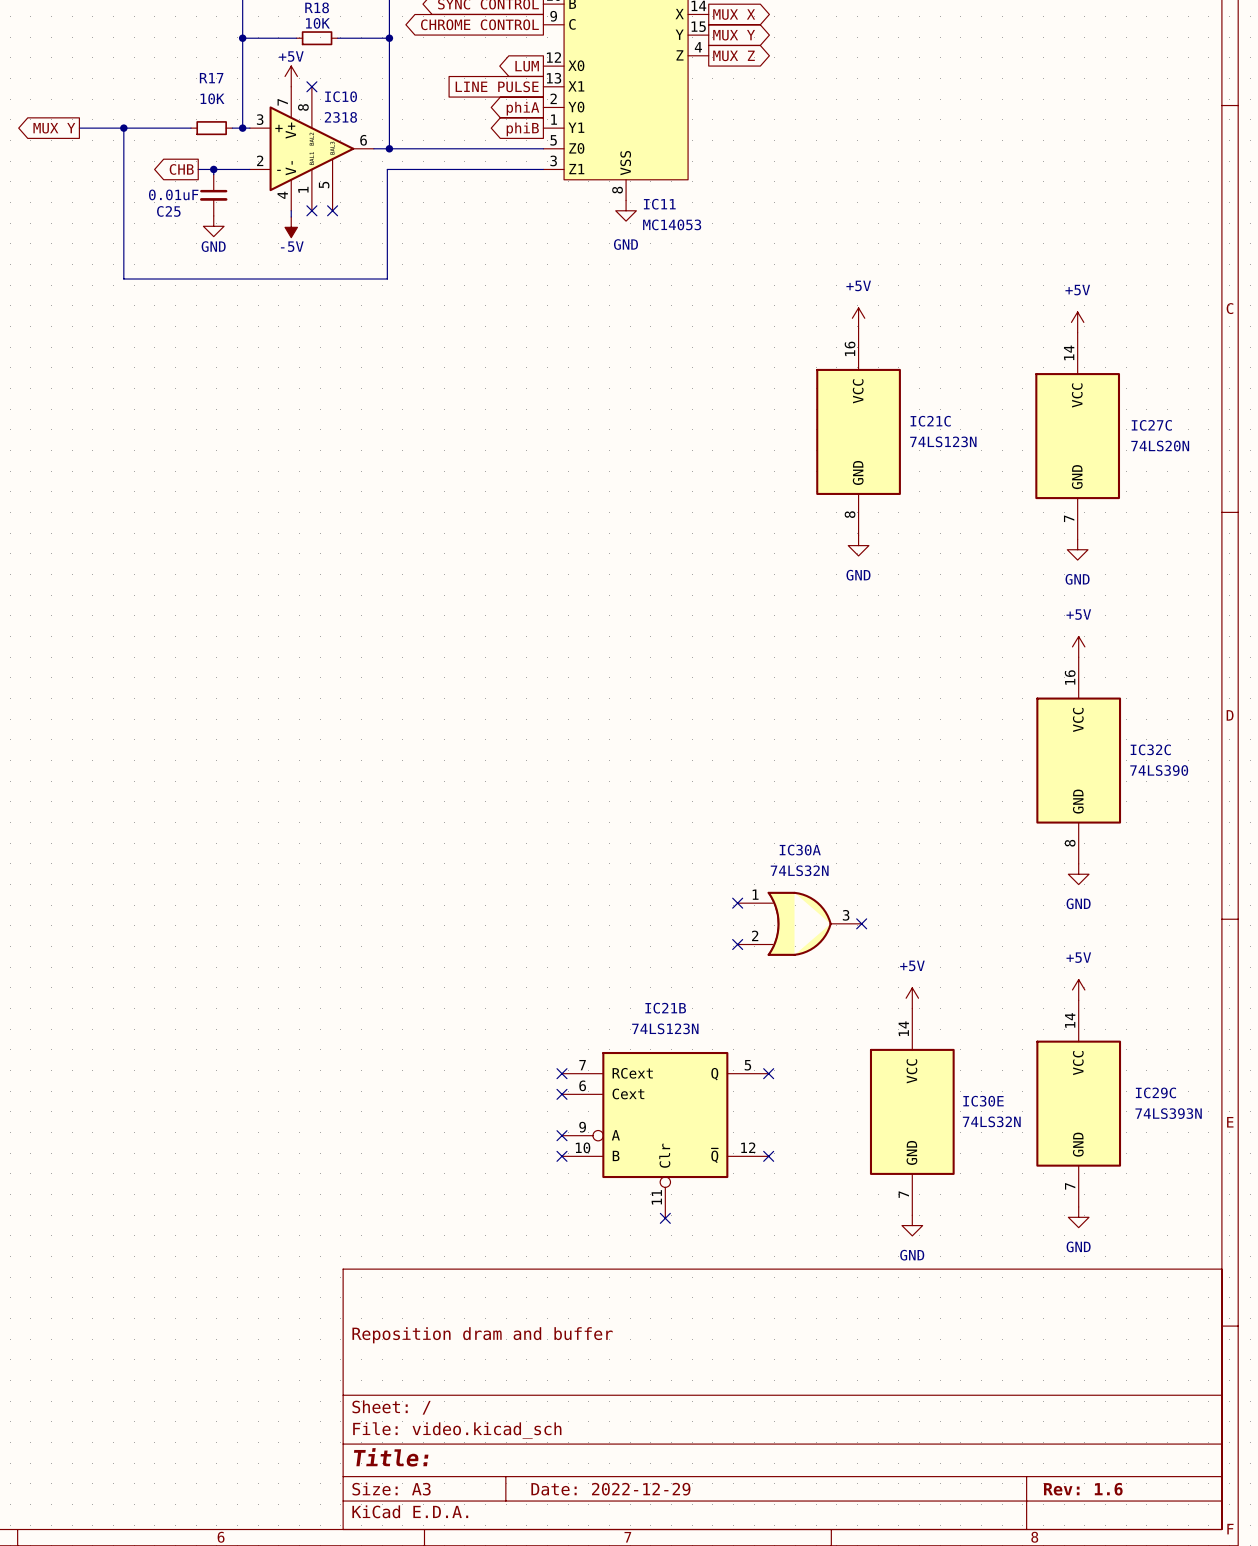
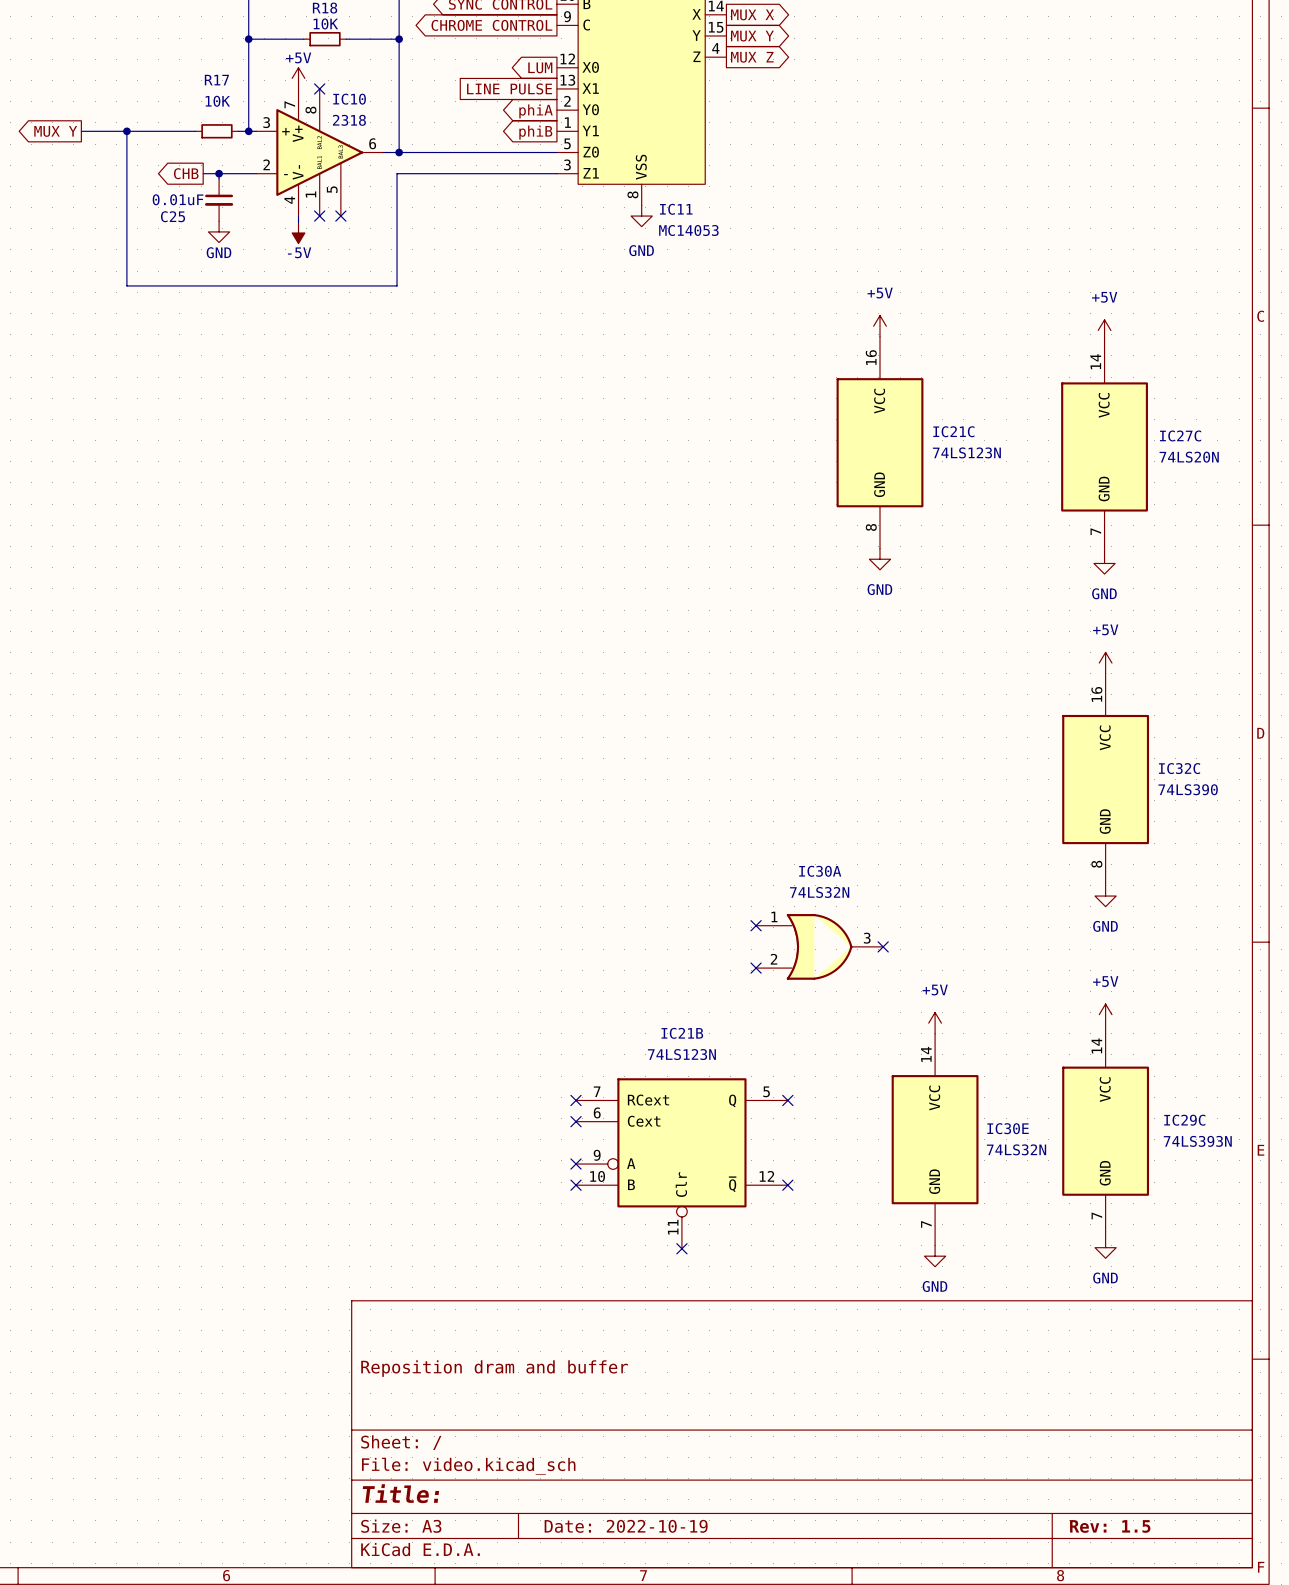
title block: Date: 2022-12-29 (610, 1489) -> Date: 2022-10-19 (626, 1526)
title block: Rev: 1.6 (1083, 1489) -> Rev: 1.5 (1110, 1526)

